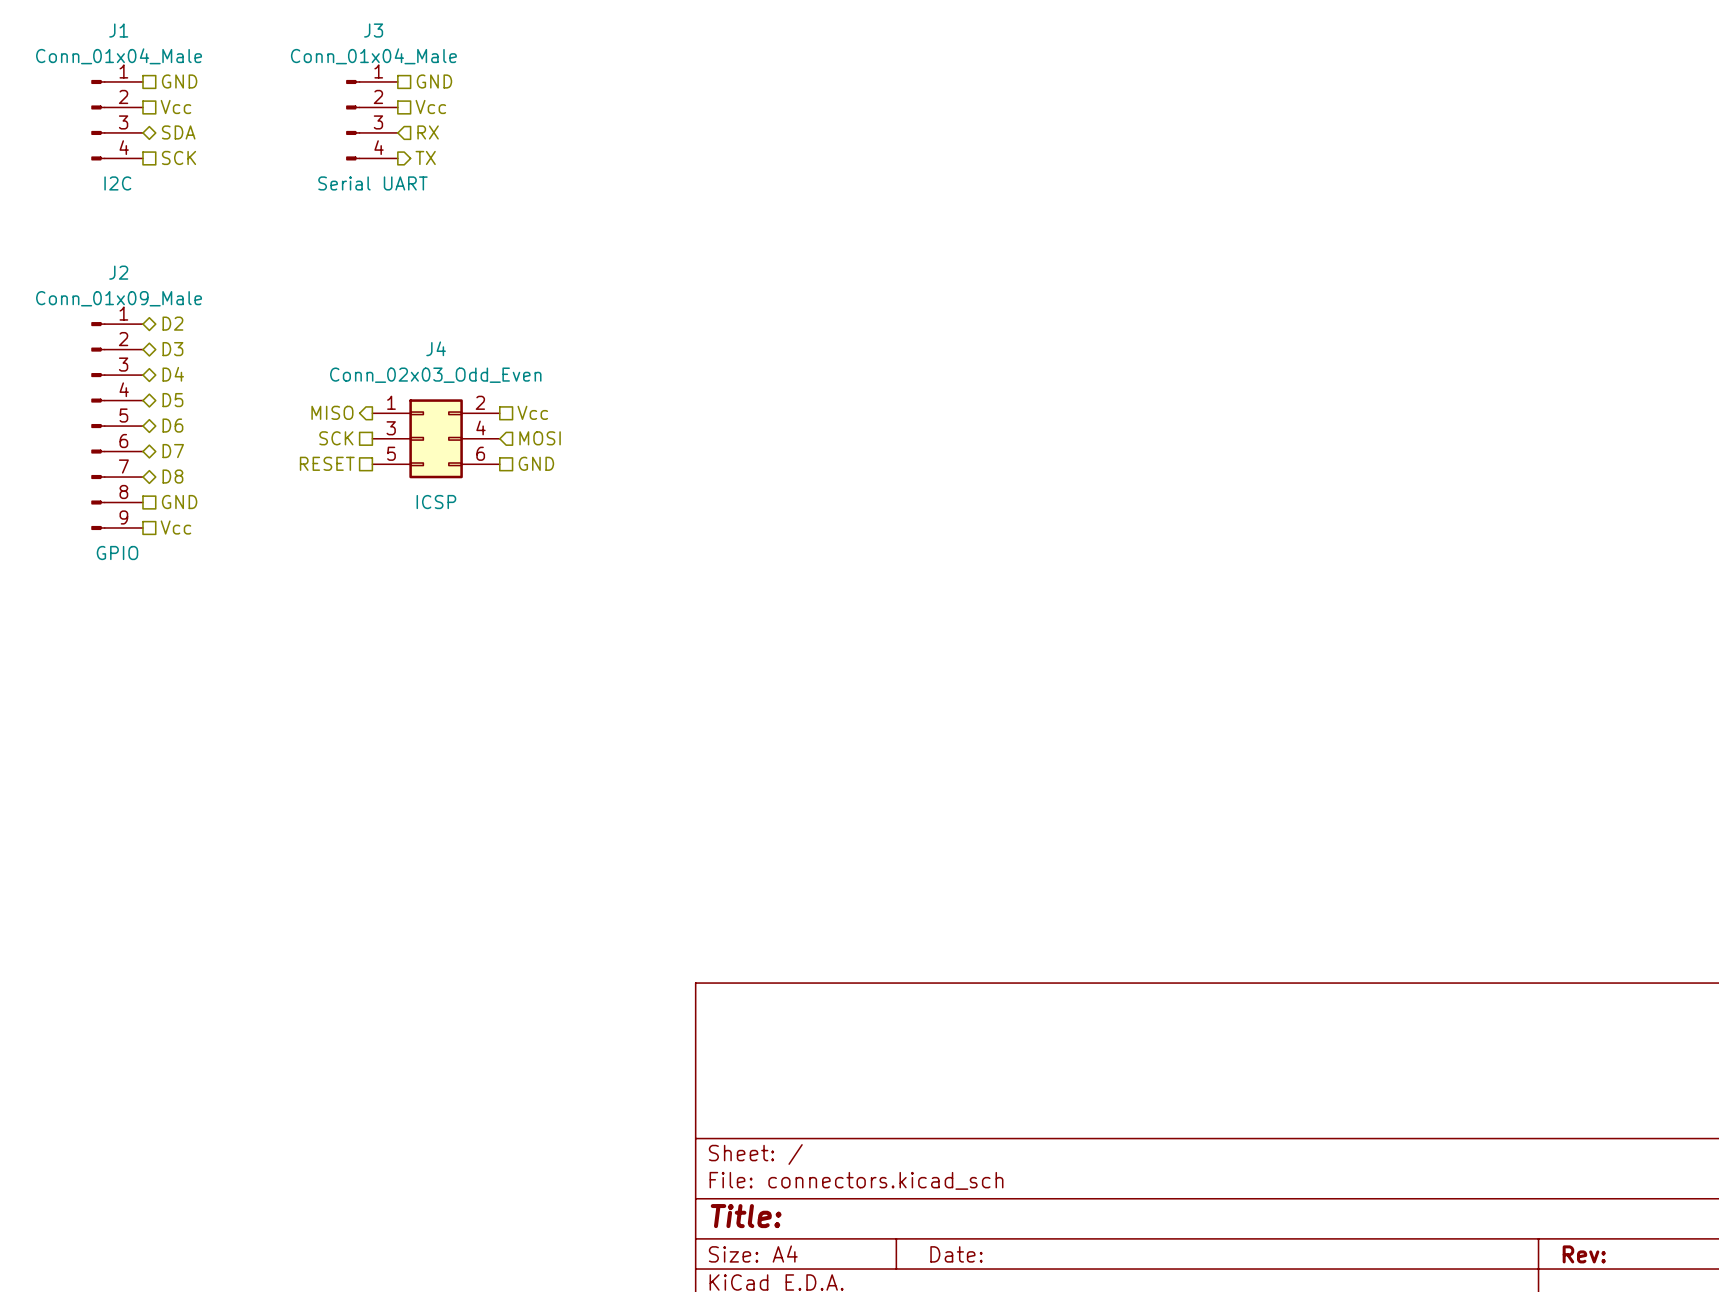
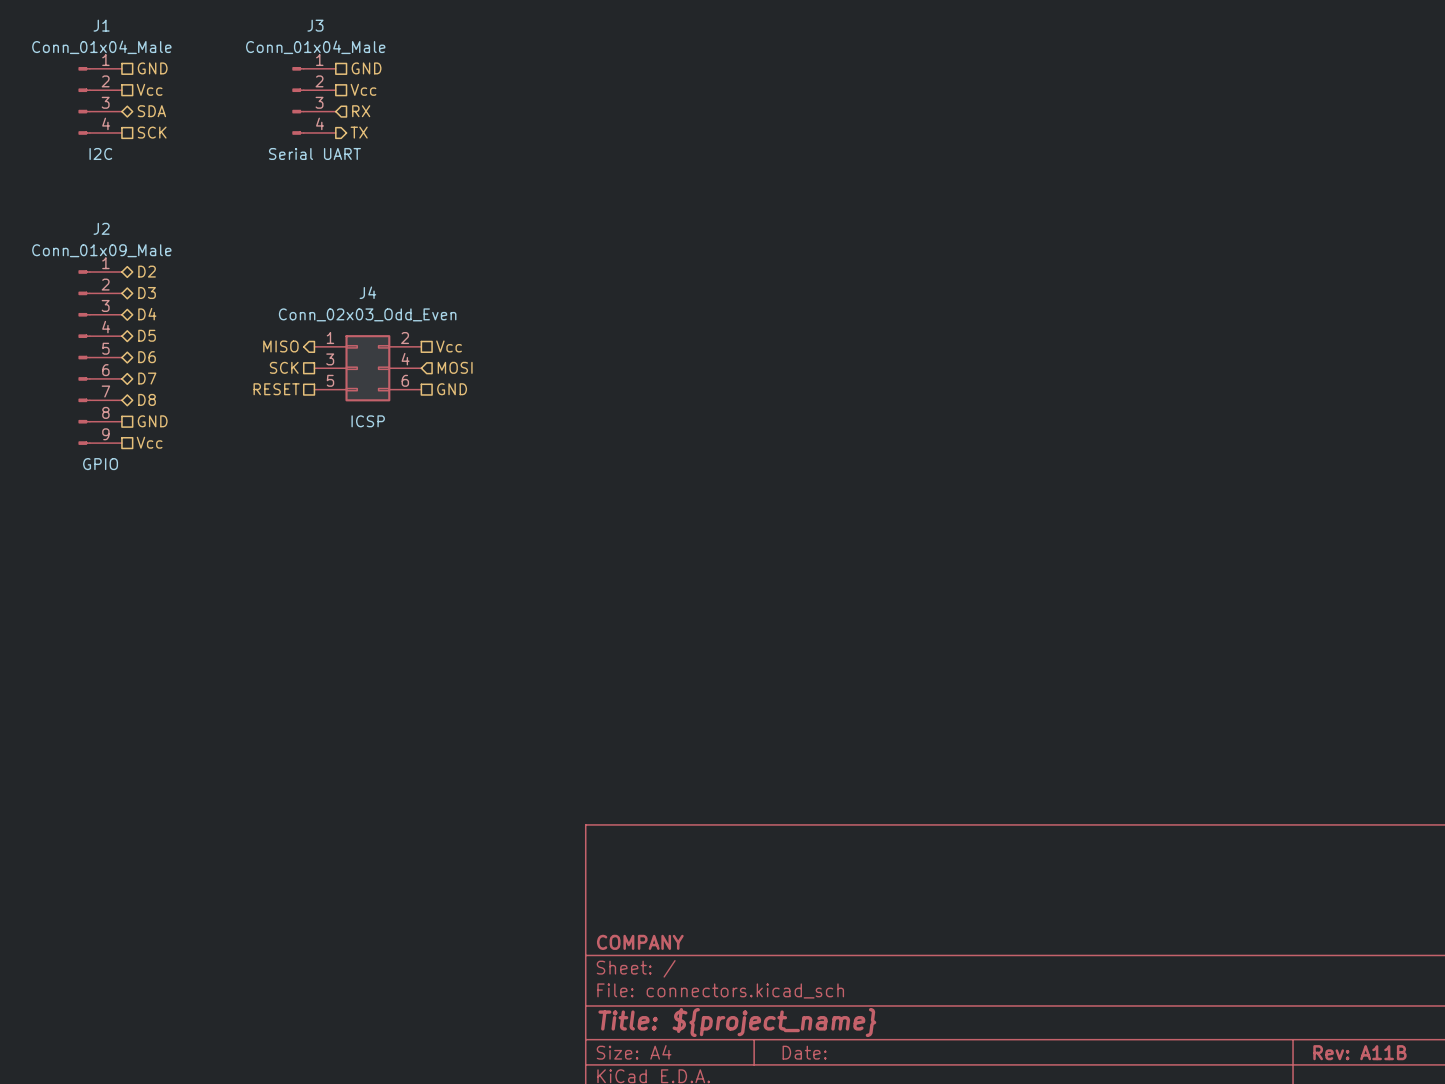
title block: none -> COMPANY (640, 942)
title block: Title: (746, 1216) -> Title: ${project_name} (737, 1022)
title block: Rev: (1584, 1254) -> Rev: A11B (1359, 1052)

